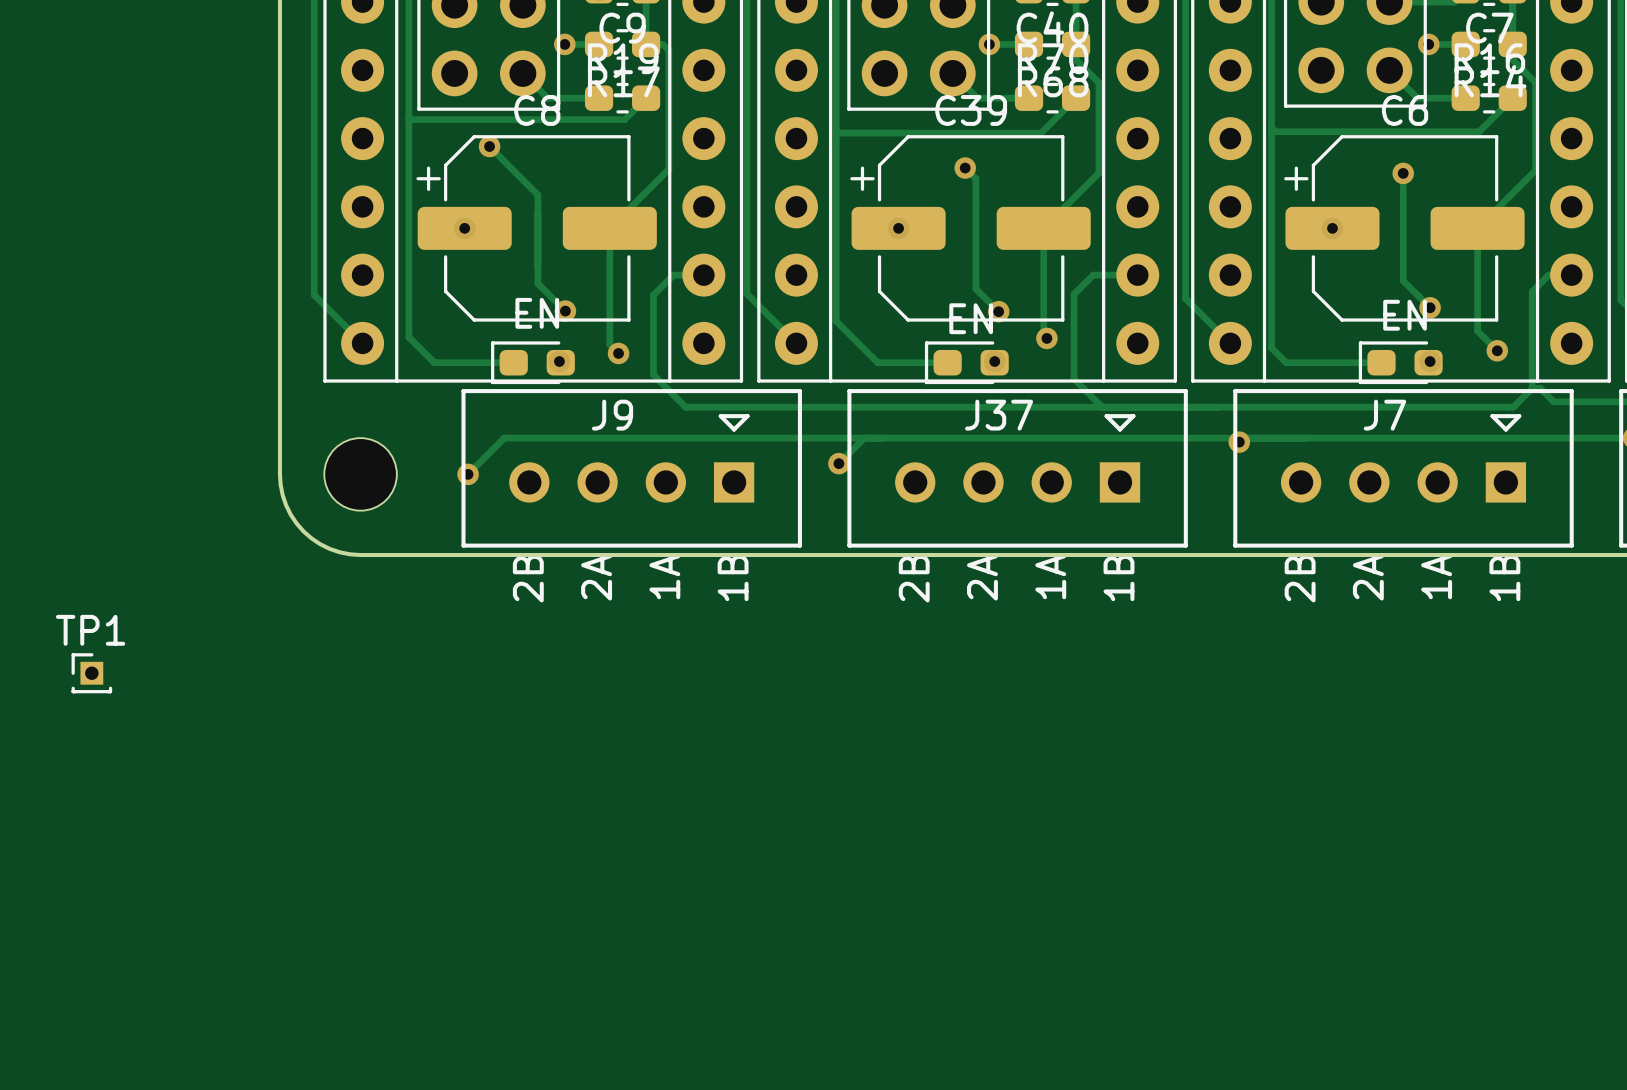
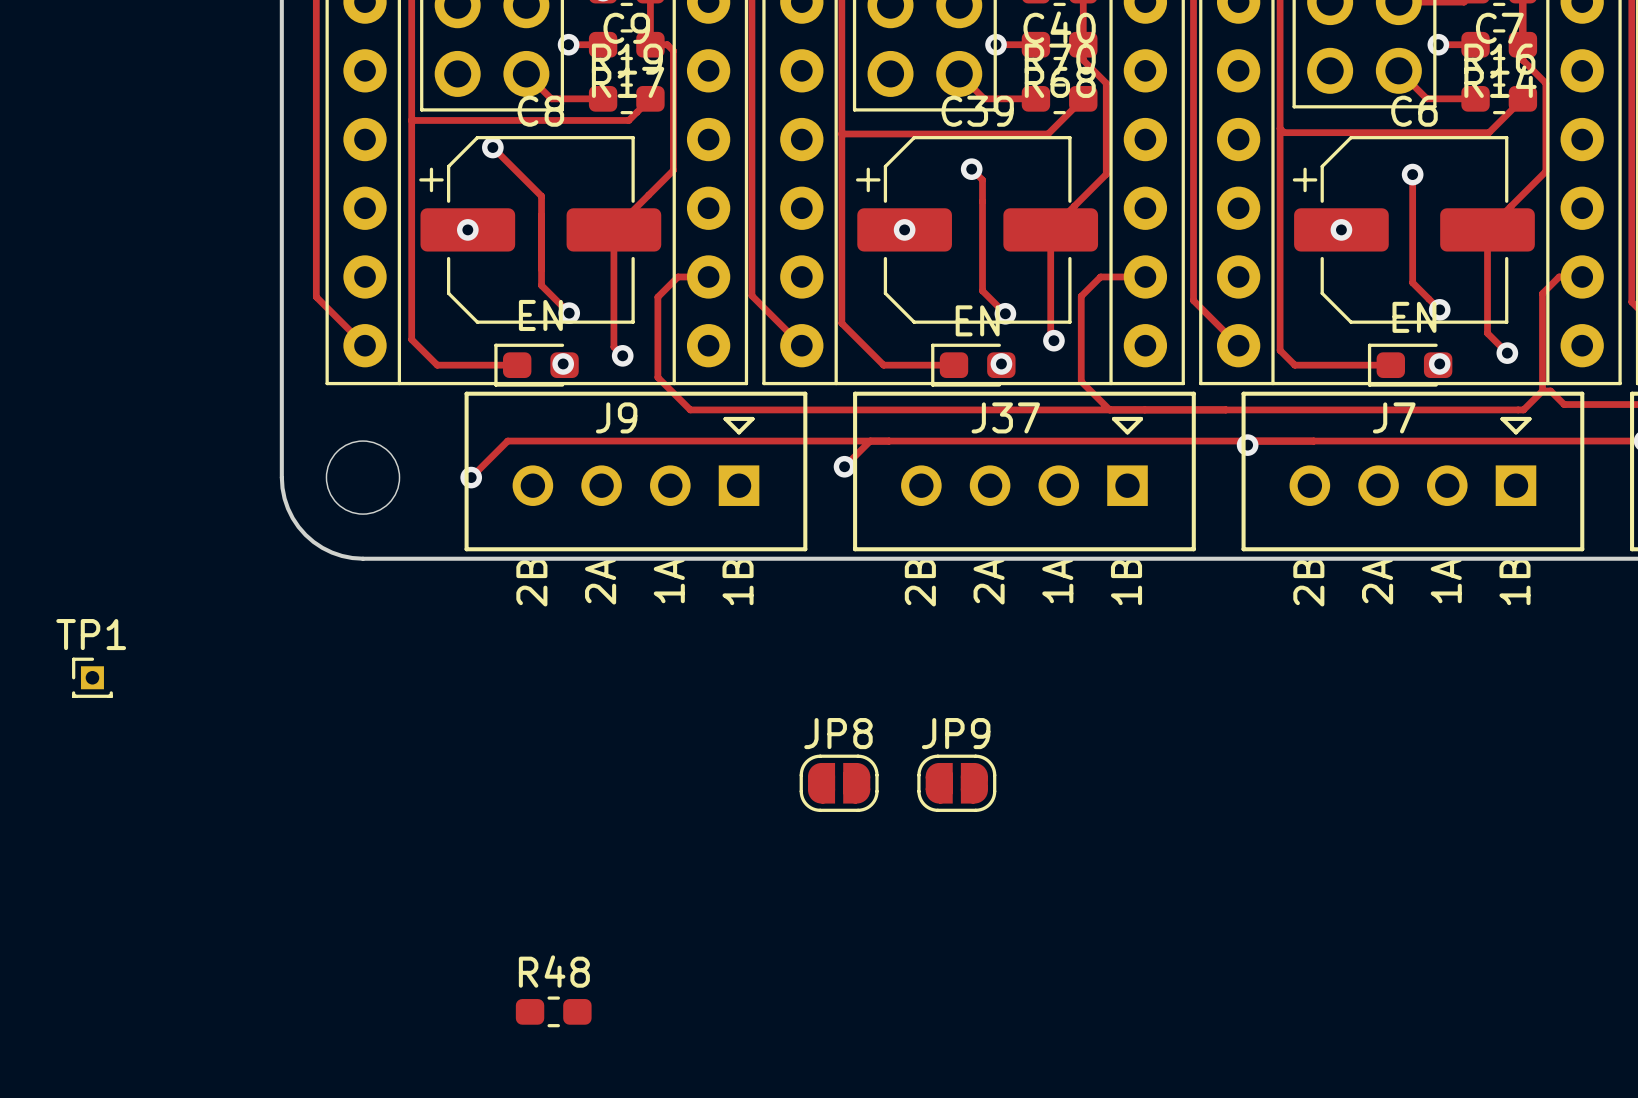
JP8: none -> (839, 783)
JP9: none -> (956, 783)
R48: none -> (553, 1011)

